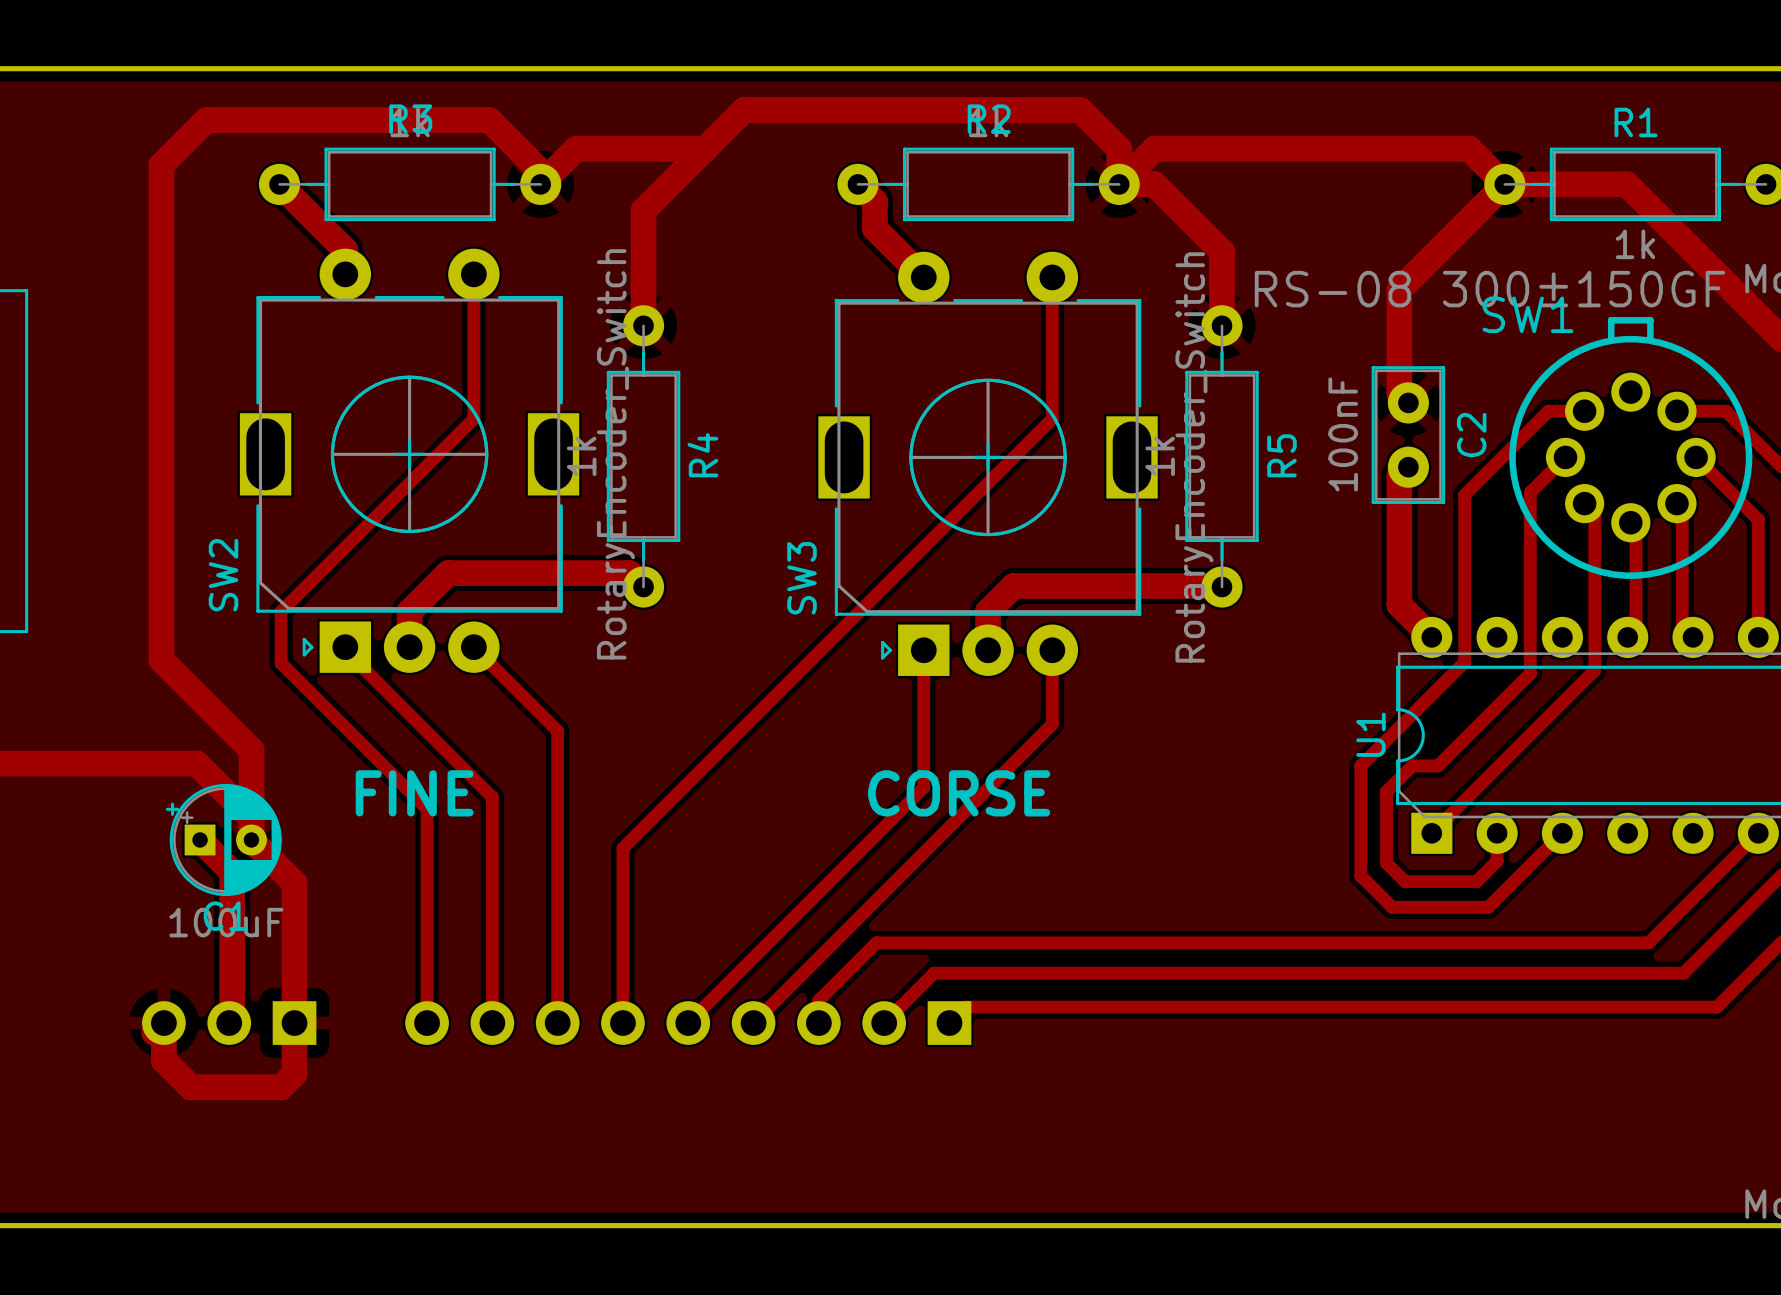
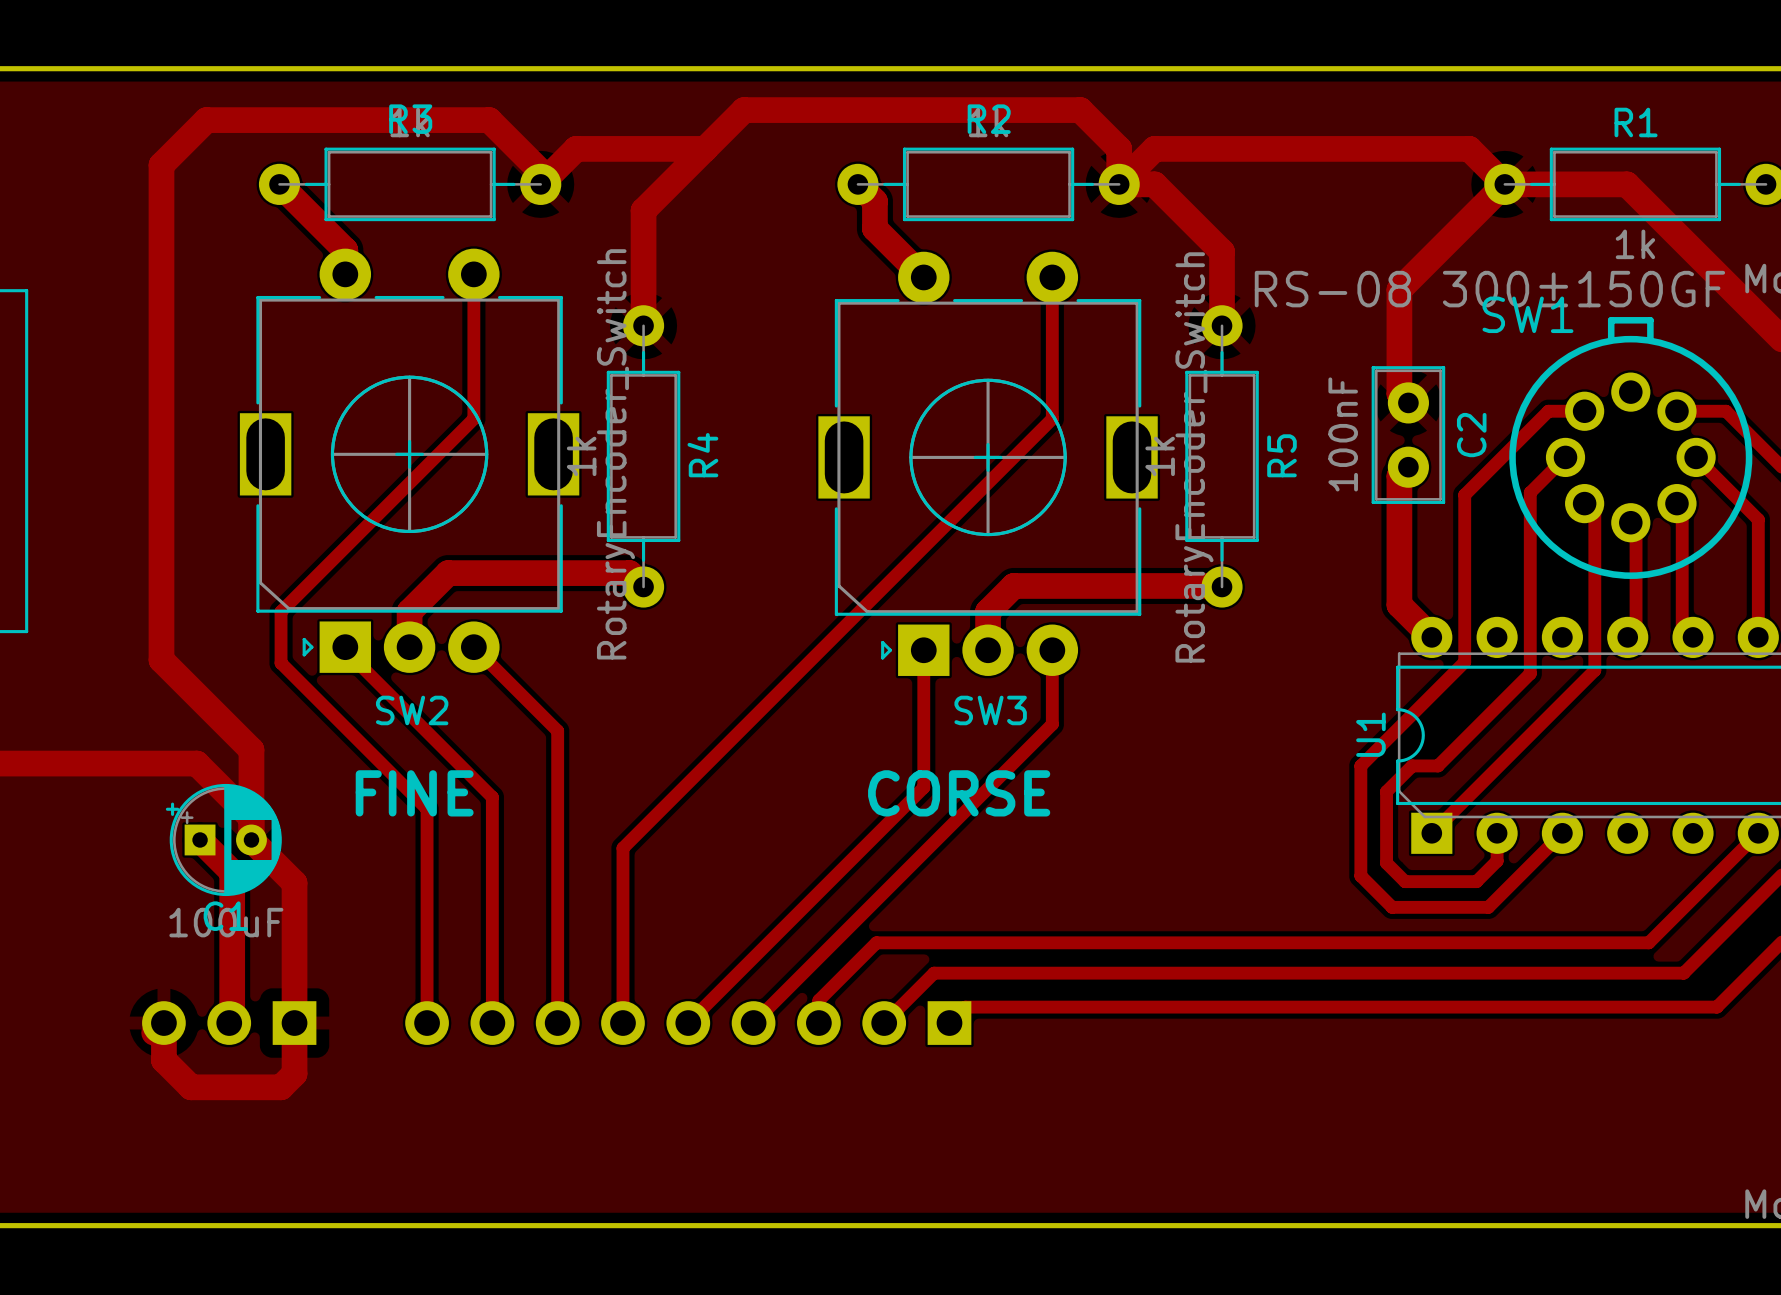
SW2 name rotation: 0° (223, 575) -> 90° clockwise (412, 710)
SW2 name position: SW2 (223, 575) -> SW2 (412, 710)
SW3 name rotation: 0° (801, 578) -> 90° clockwise (990, 710)
SW3 name position: SW3 (801, 578) -> SW3 (990, 710)

